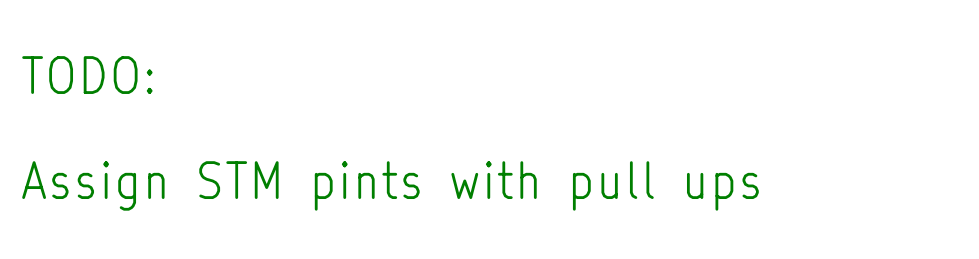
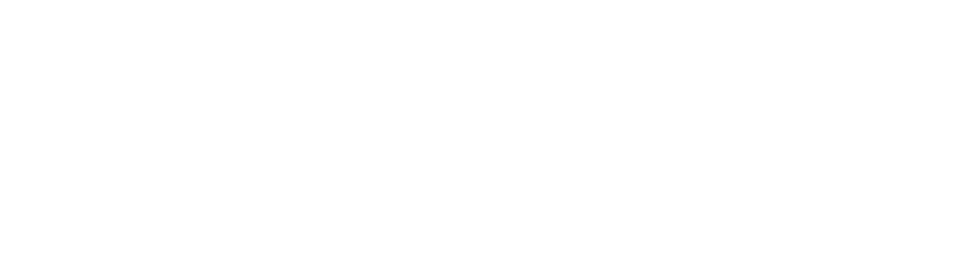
text: TODO: (87, 75) -> none
text: Assign STM pints with pull ups (390, 185) -> none

